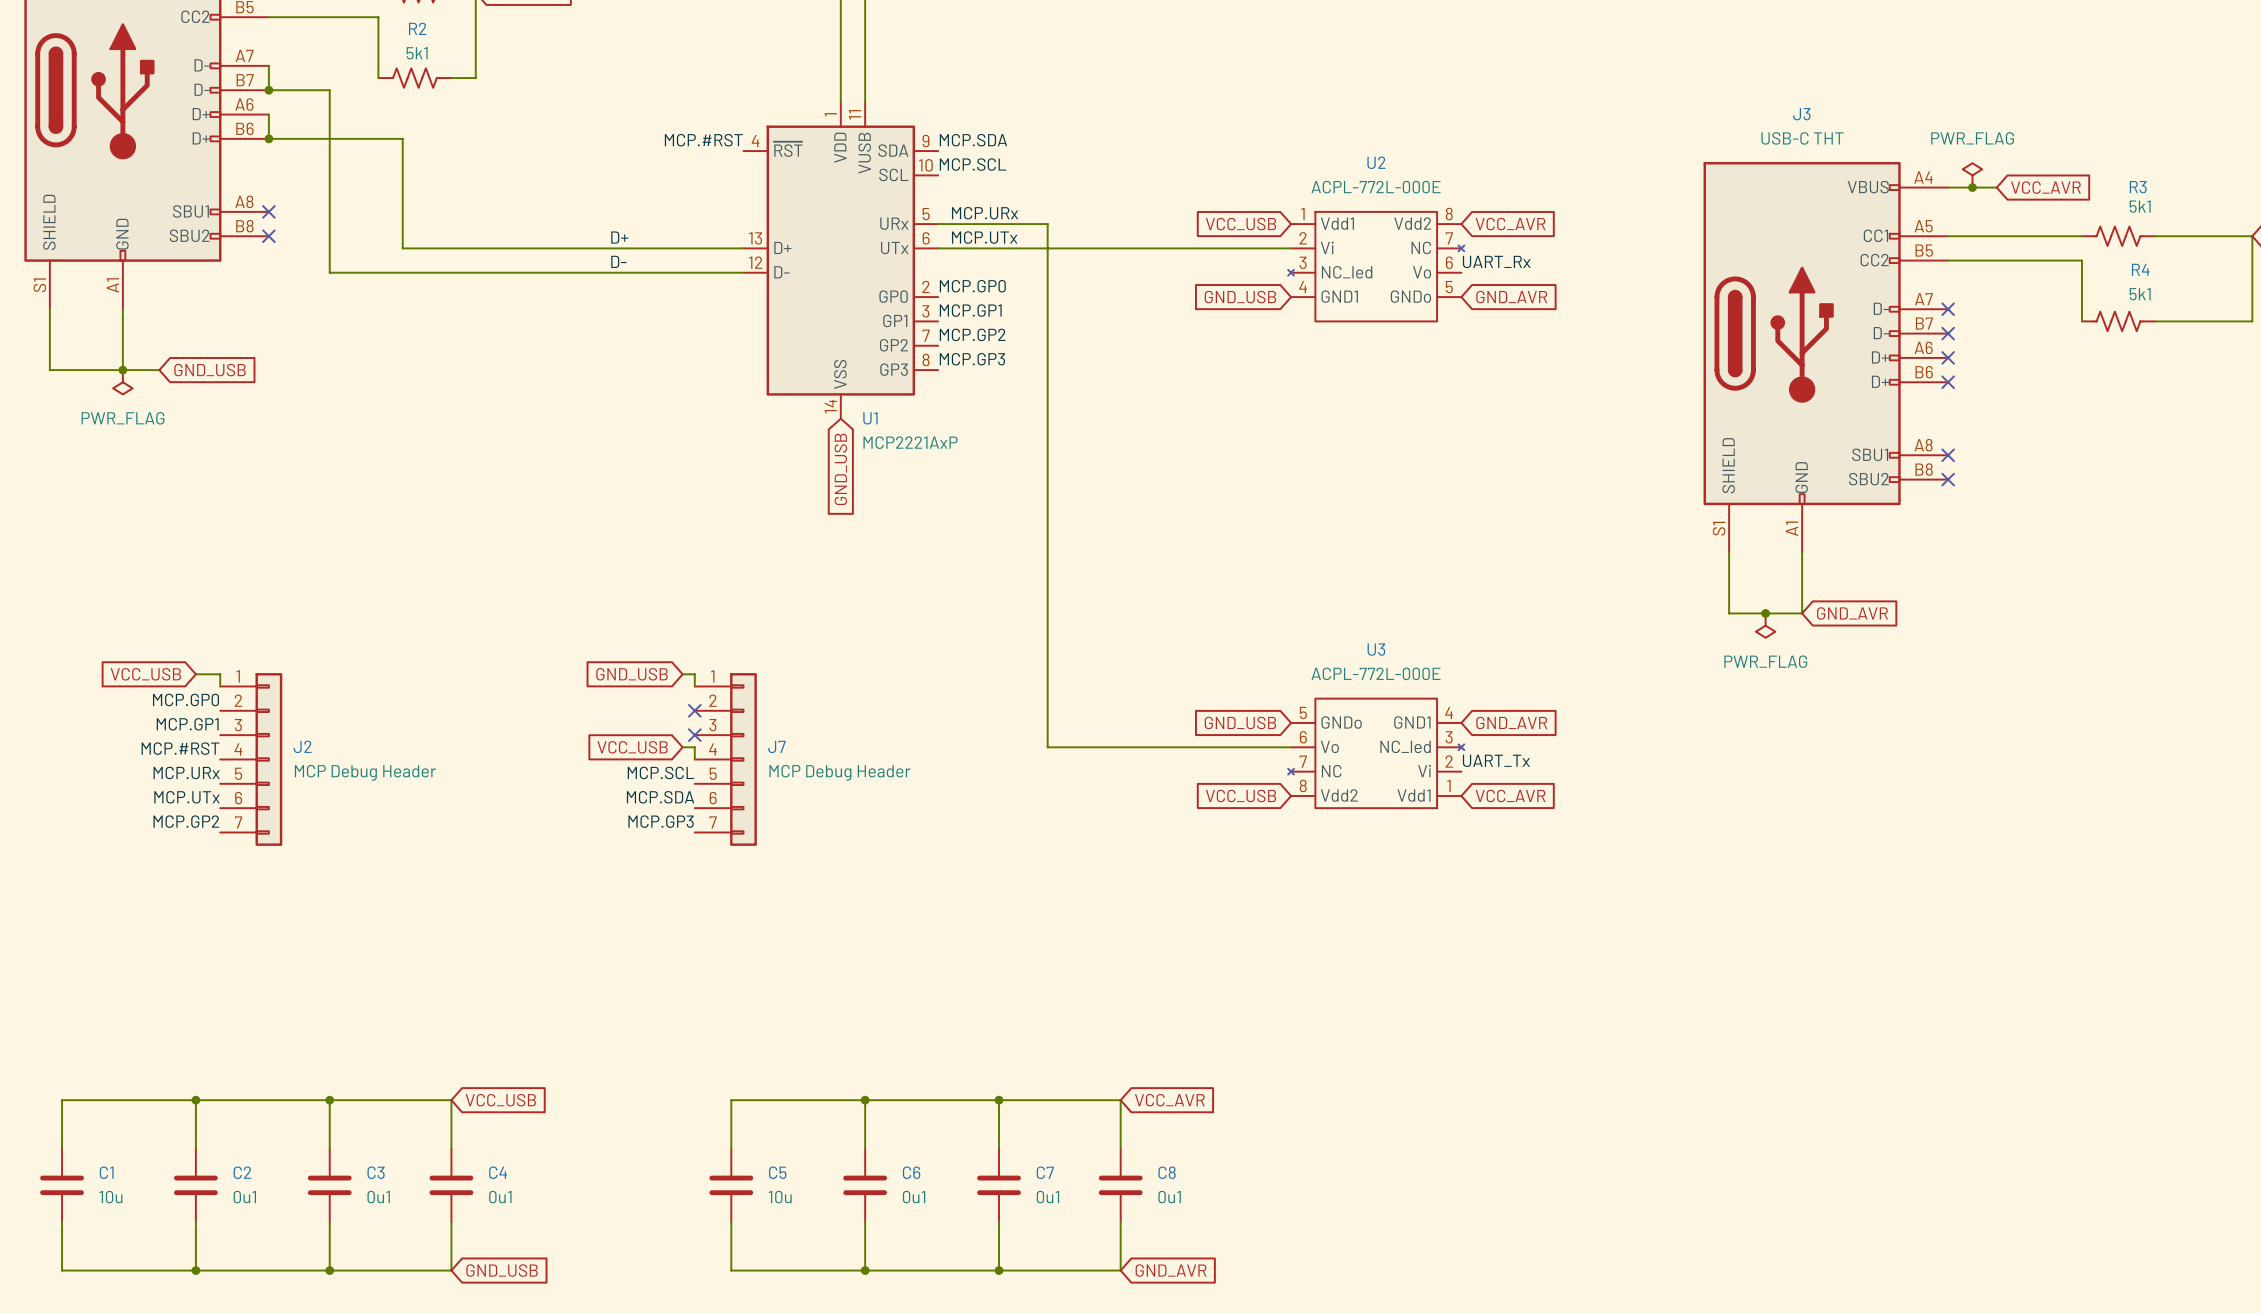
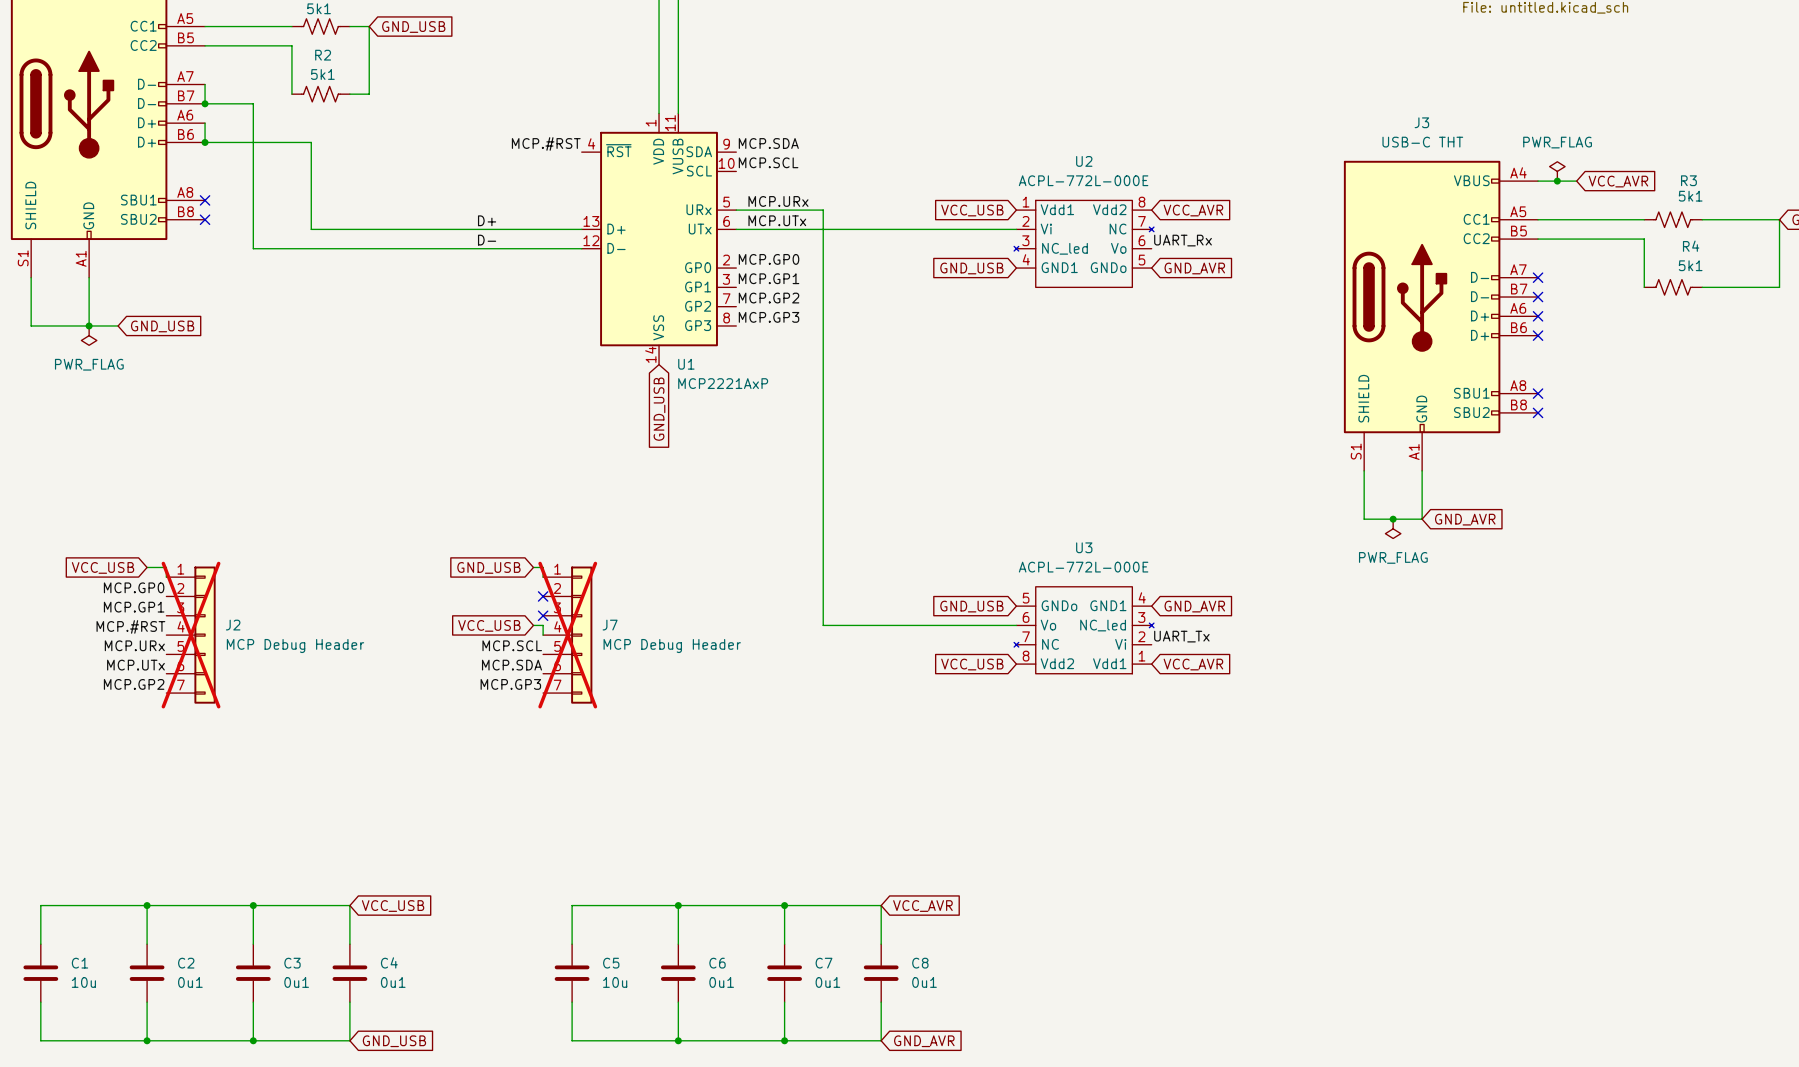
J2 do-not-place cross: none -> (191, 635)
J7 do-not-place cross: none -> (567, 635)

